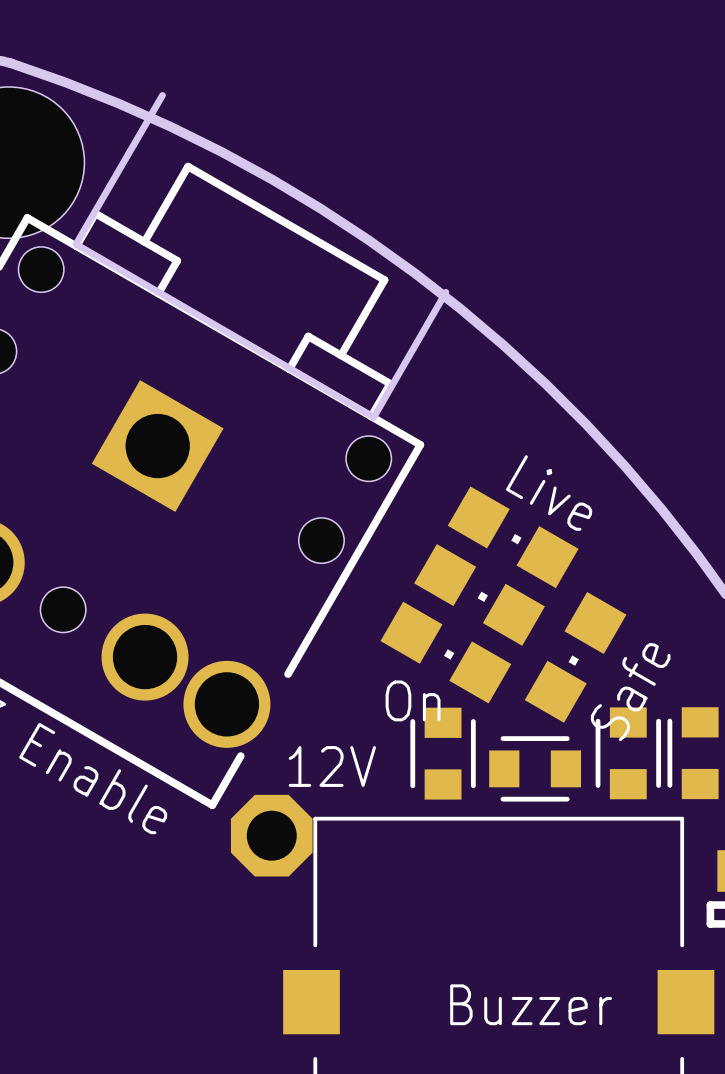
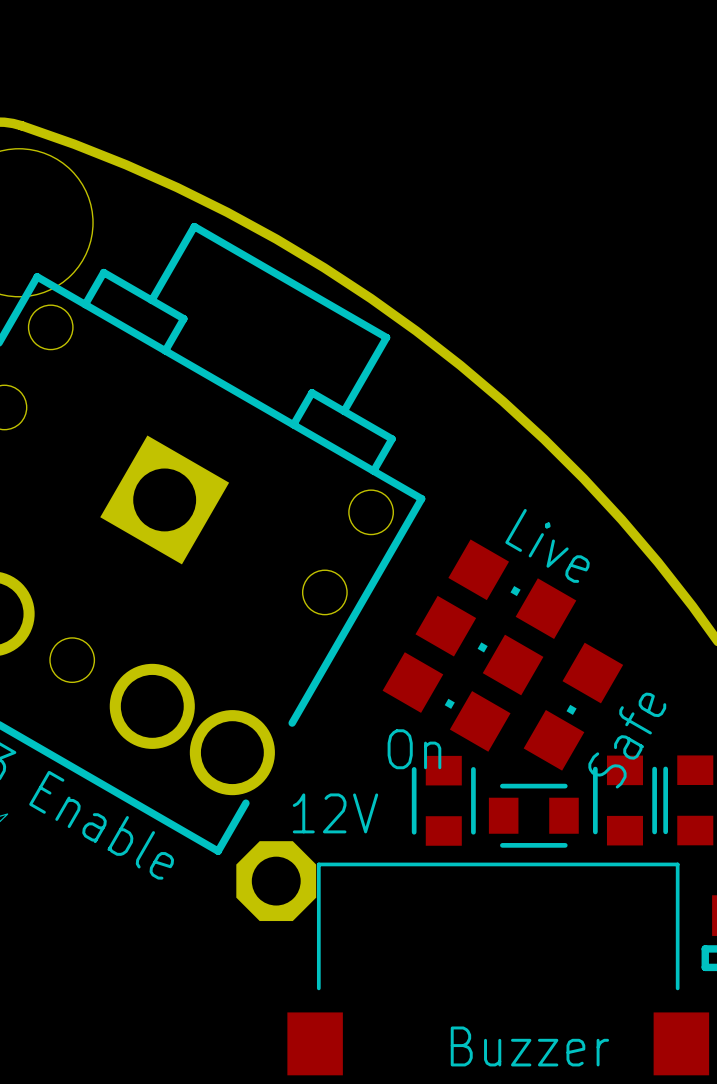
board edge: (162, 95) (76, 244) (373, 417) (445, 292) -> none

